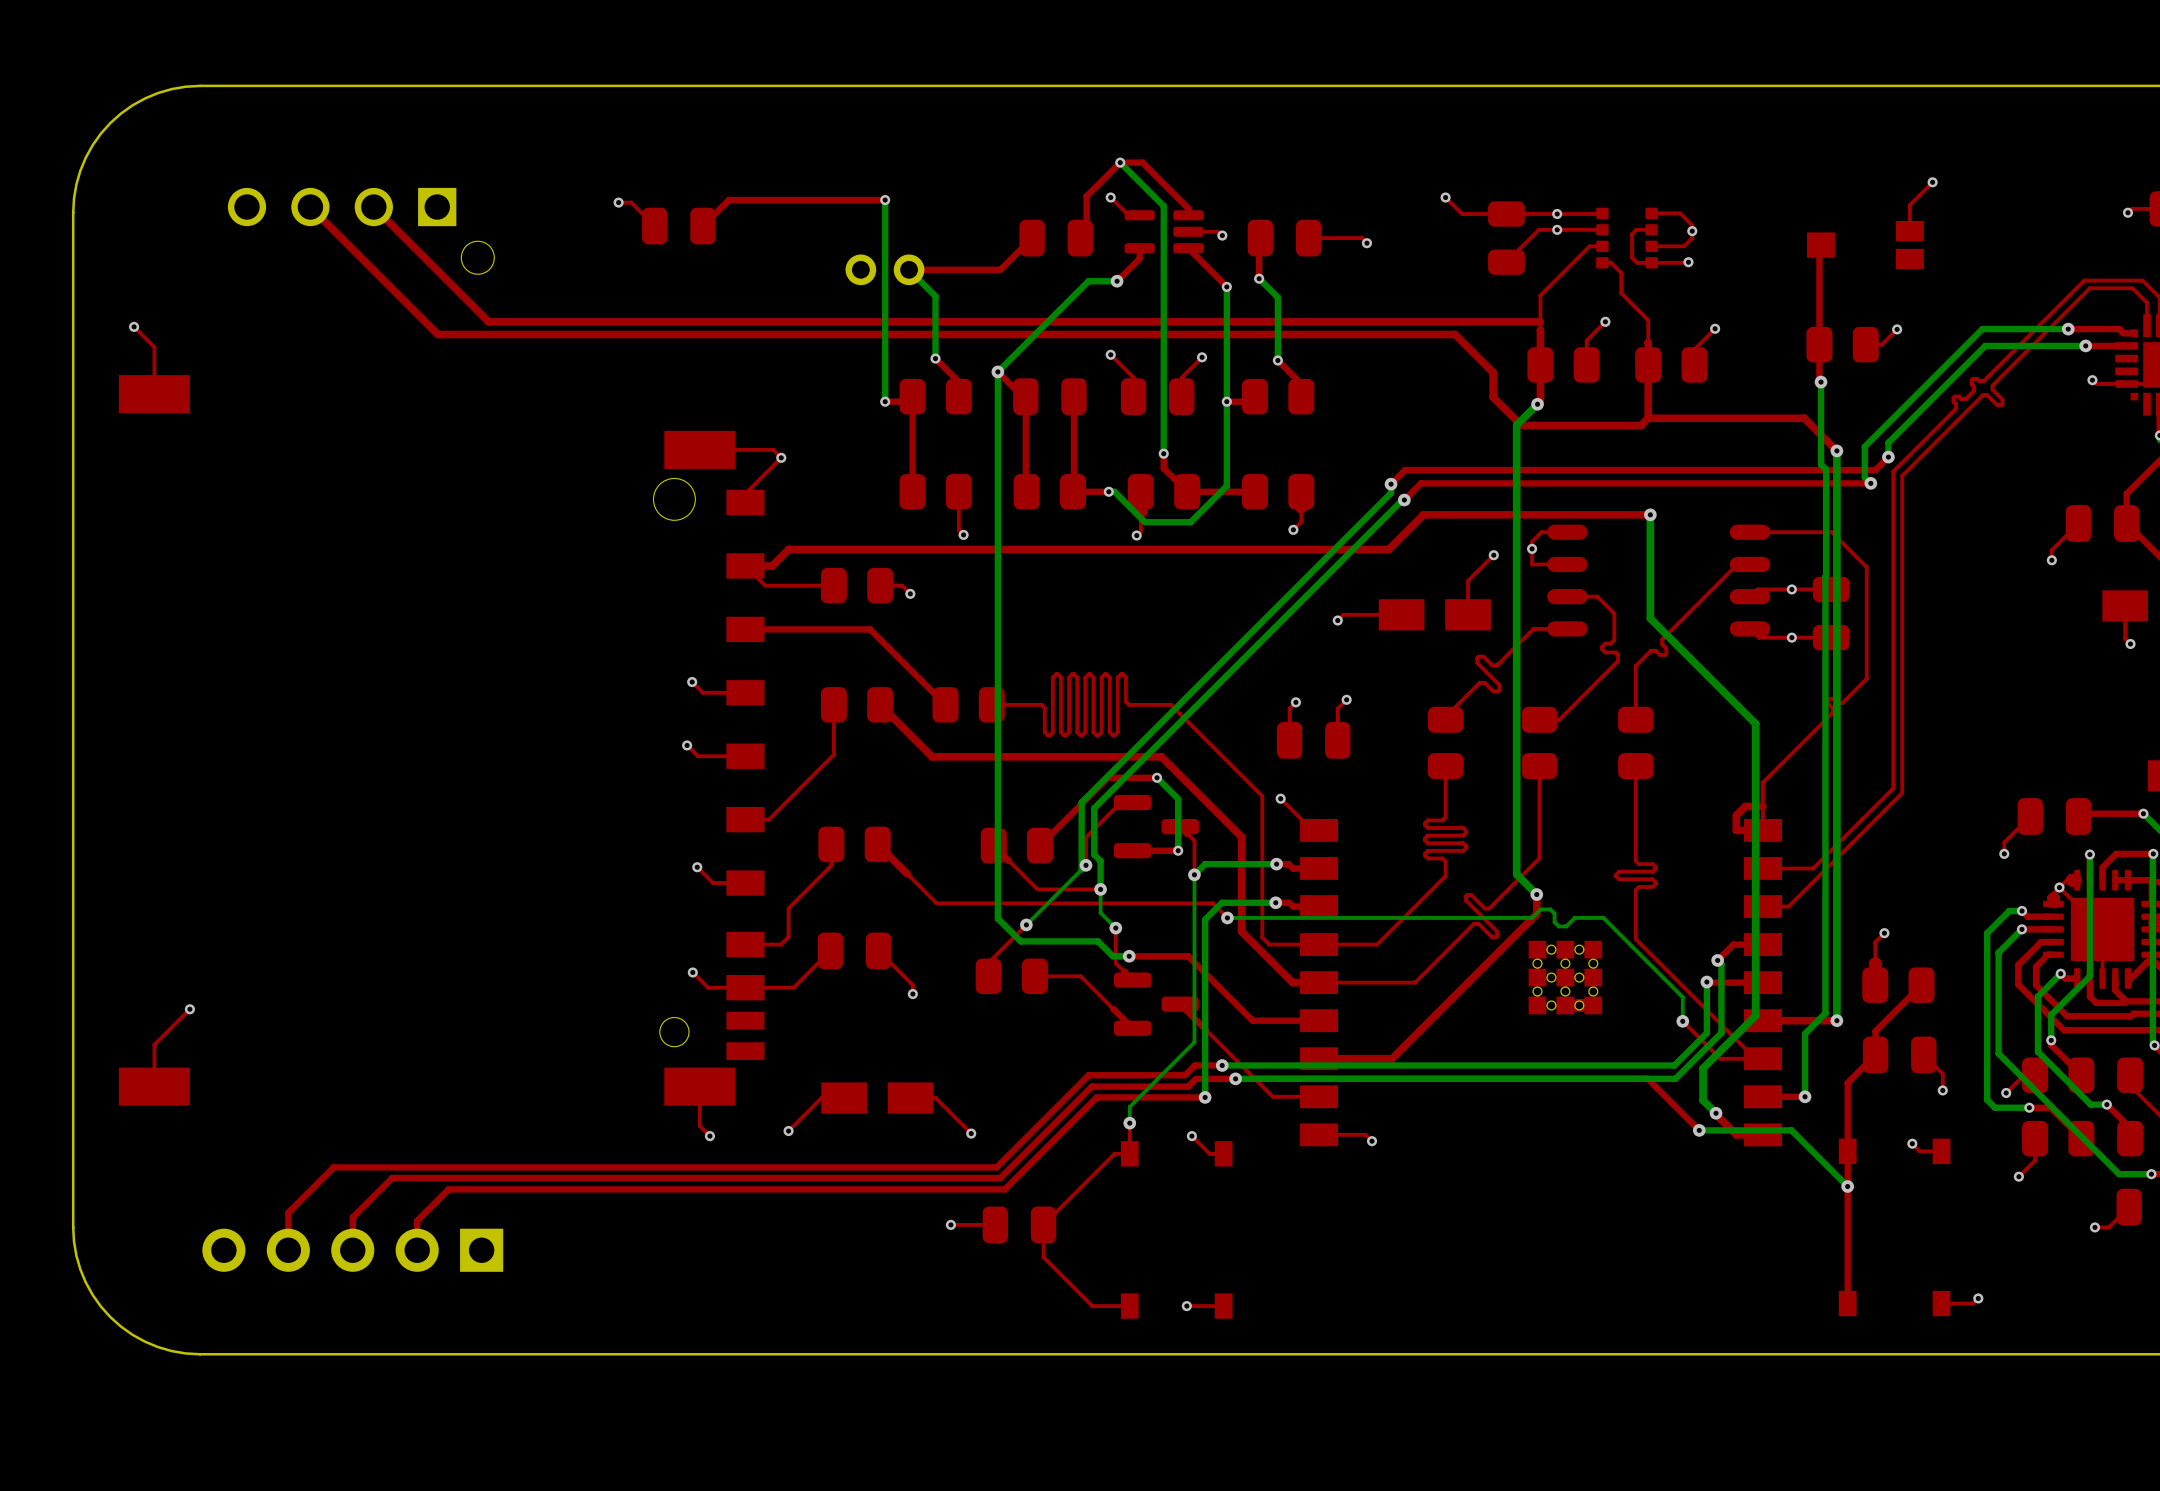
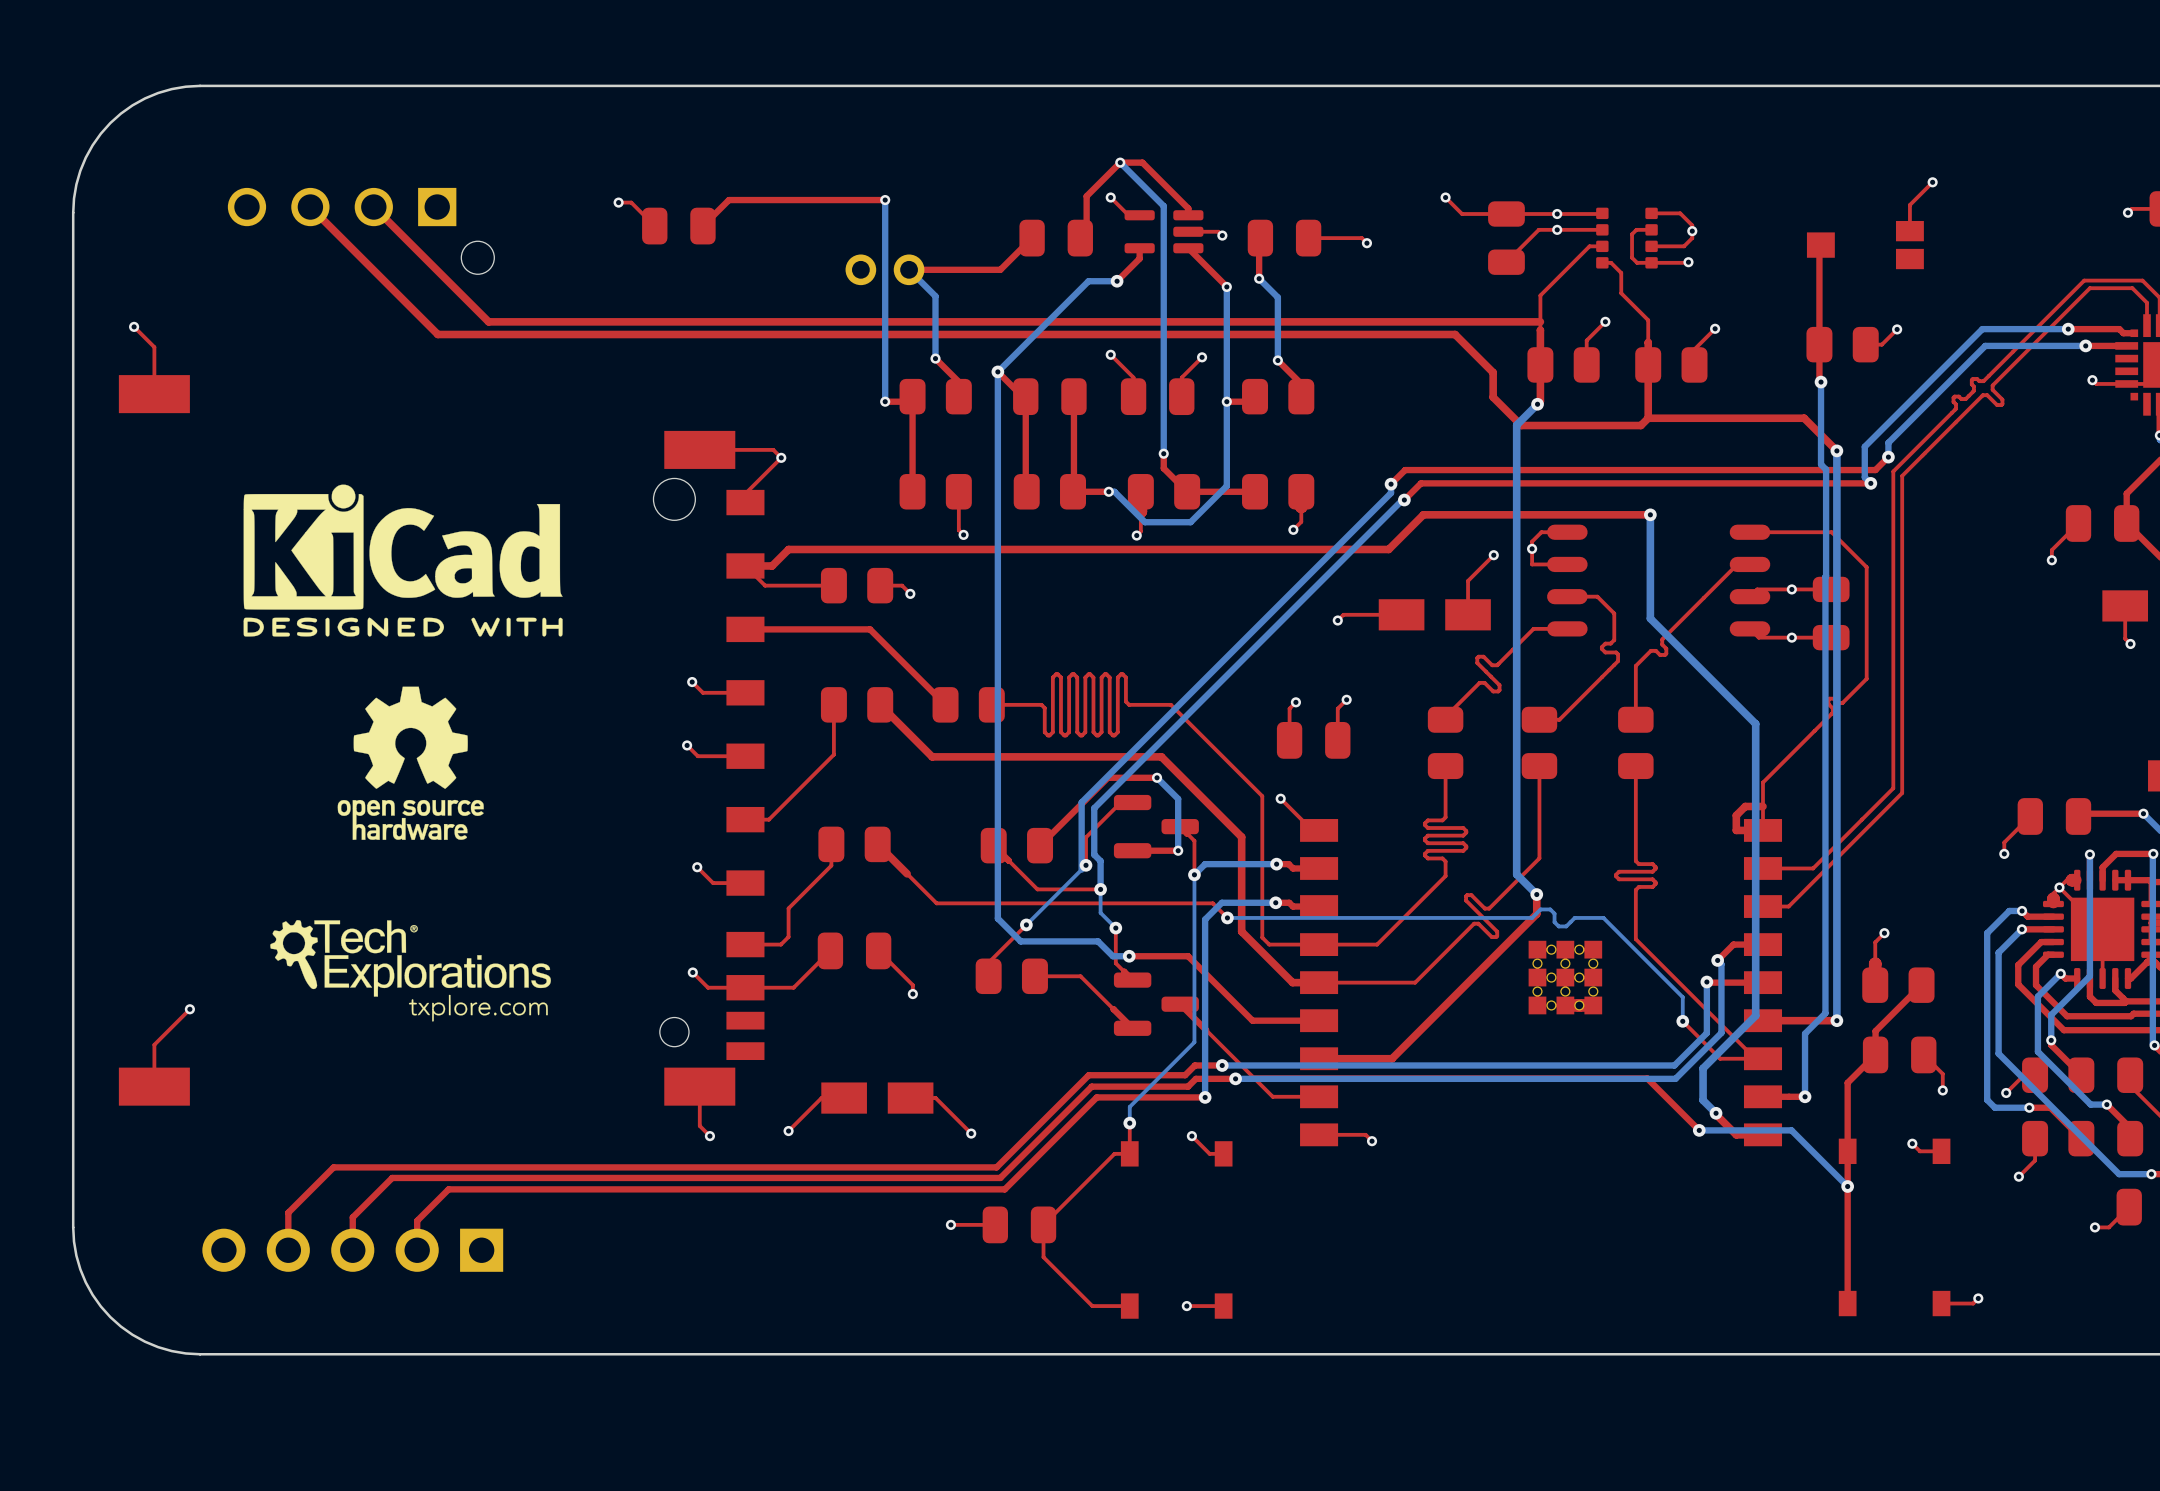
drawing: none -> [243, 484, 563, 637]
drawing: none -> [337, 686, 484, 840]
drawing: none -> [270, 920, 551, 1022]

